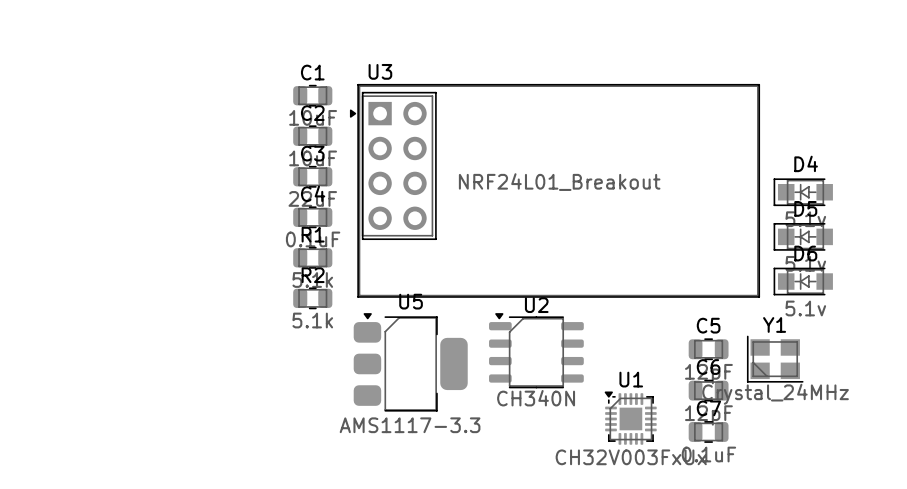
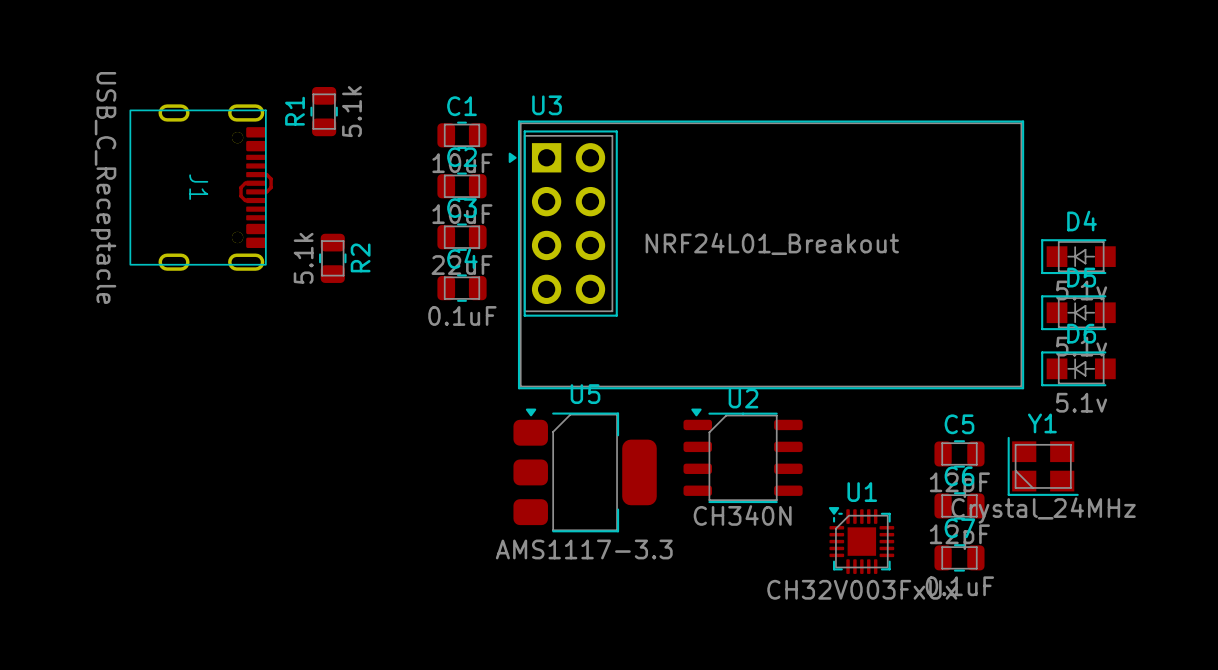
track: none -> (256, 174) (266, 174) (271, 178) (271, 187) (266, 191) (256, 191)
track: none -> (256, 183) (245, 183) (240, 187) (240, 196) (245, 200) (256, 200)
J1: none -> USB_C_Receptacle (198, 187)
R1 name position: R1 (313, 234) -> R1 (295, 111)
R1 rotation: 0° (312, 257) -> 90° clockwise (324, 111)
R1 position: (312, 257) -> (324, 111)
R1 value position: 5.1k (312, 279) -> 5.1k (351, 111)
R2 rotation: 0° (312, 298) -> 90° clockwise (332, 258)
R2 position: (312, 298) -> (332, 258)

